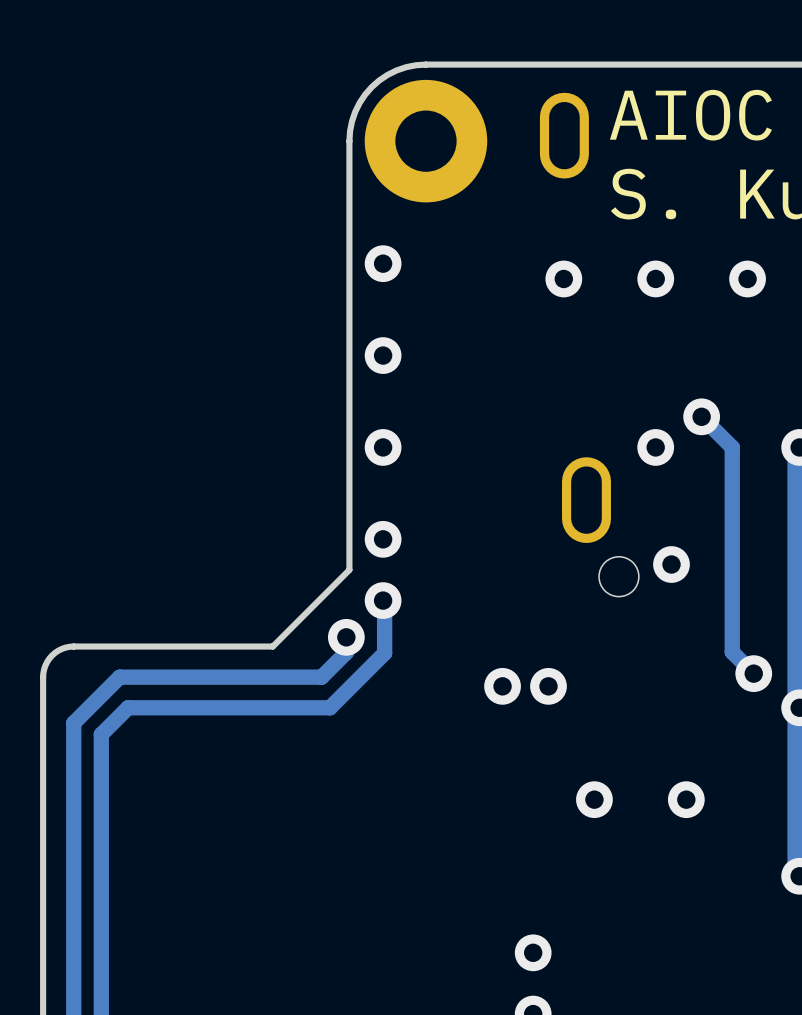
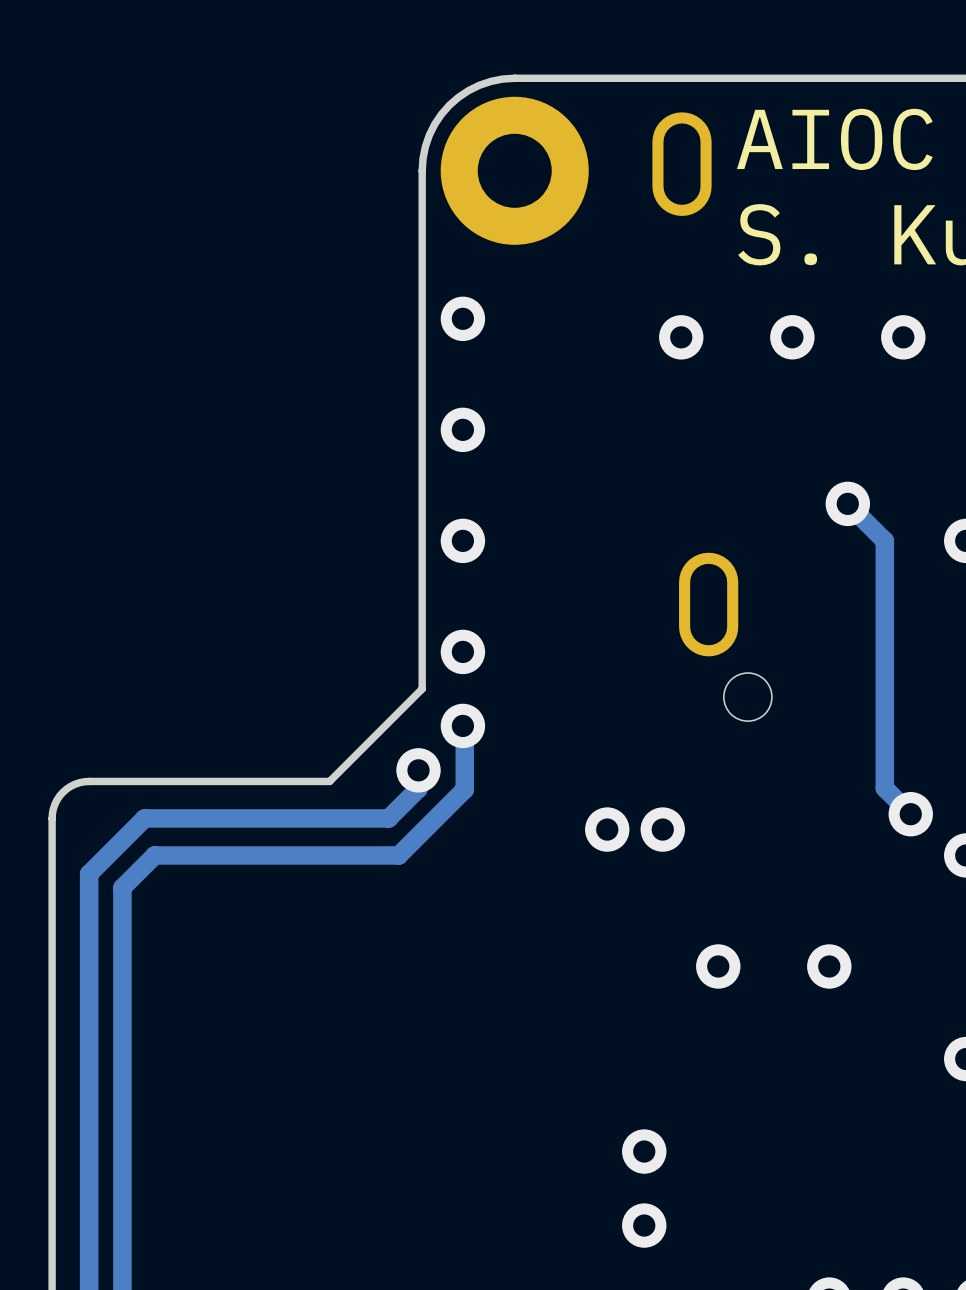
via: (655, 447) -> none
via: (671, 564) -> none

